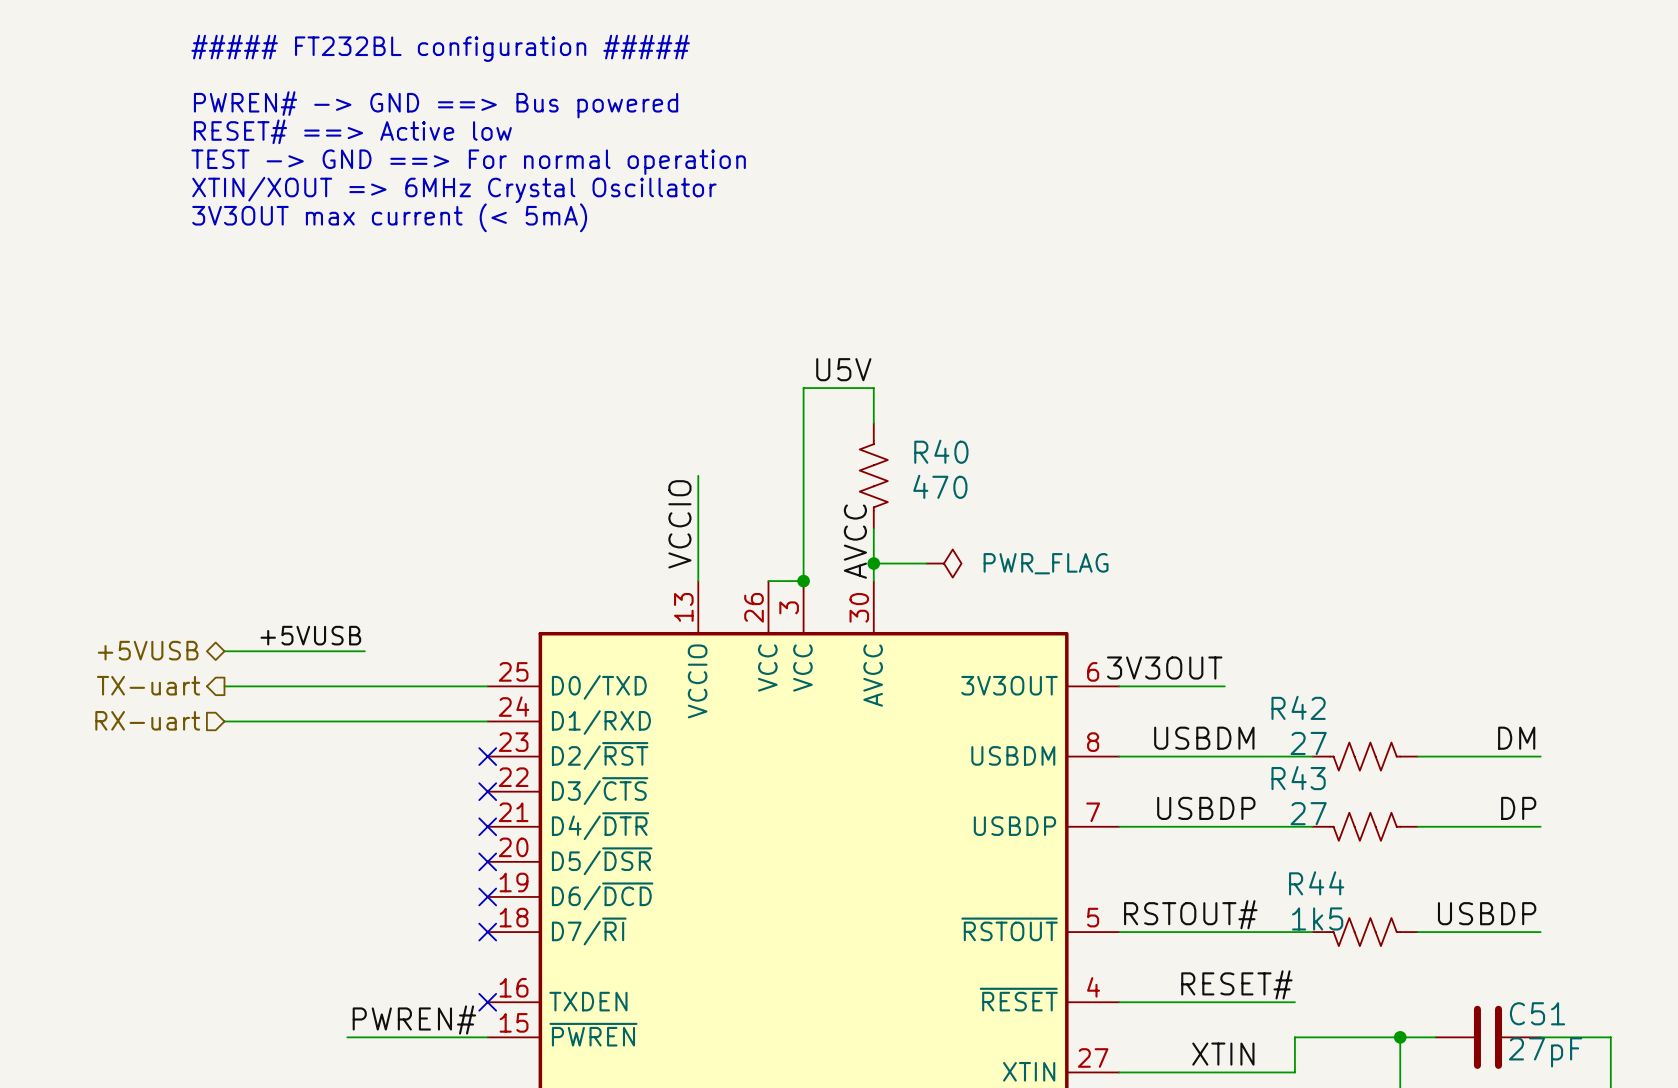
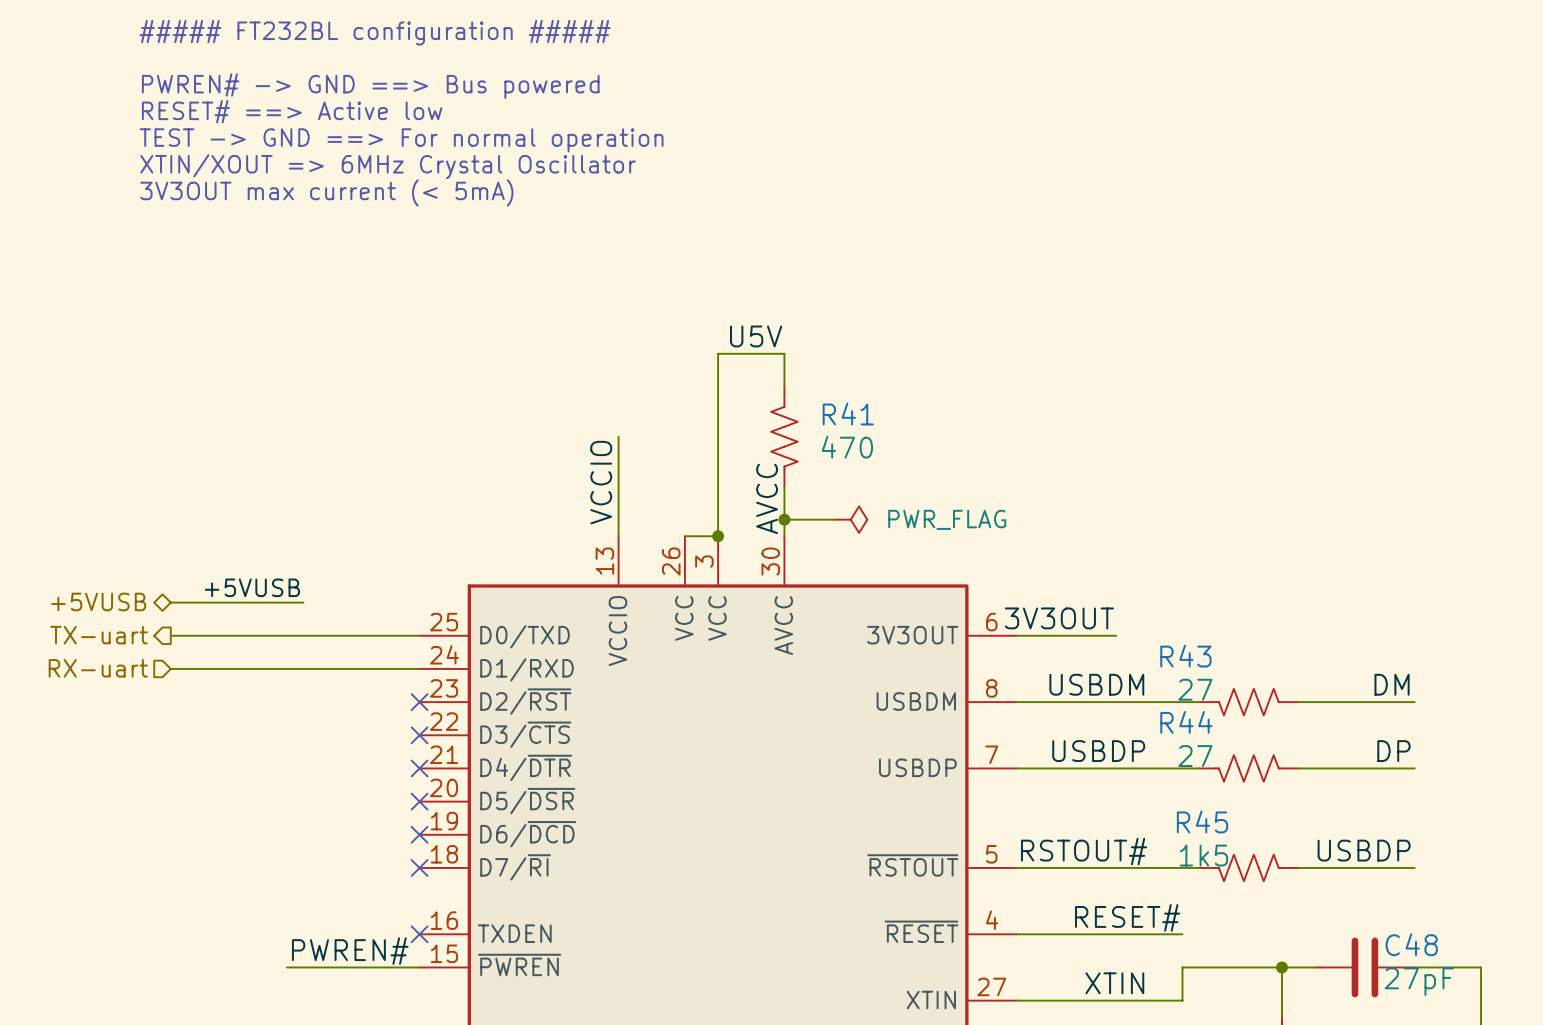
R40 name: R40 (941, 451) -> R41 (848, 414)
R42 name: R42 (1298, 707) -> R43 (1185, 656)
R43 name: R43 (1298, 778) -> R44 (1186, 722)
R44 name: R44 (1316, 883) -> R45 (1202, 821)
C51 name: C51 (1537, 1013) -> C48 (1411, 944)

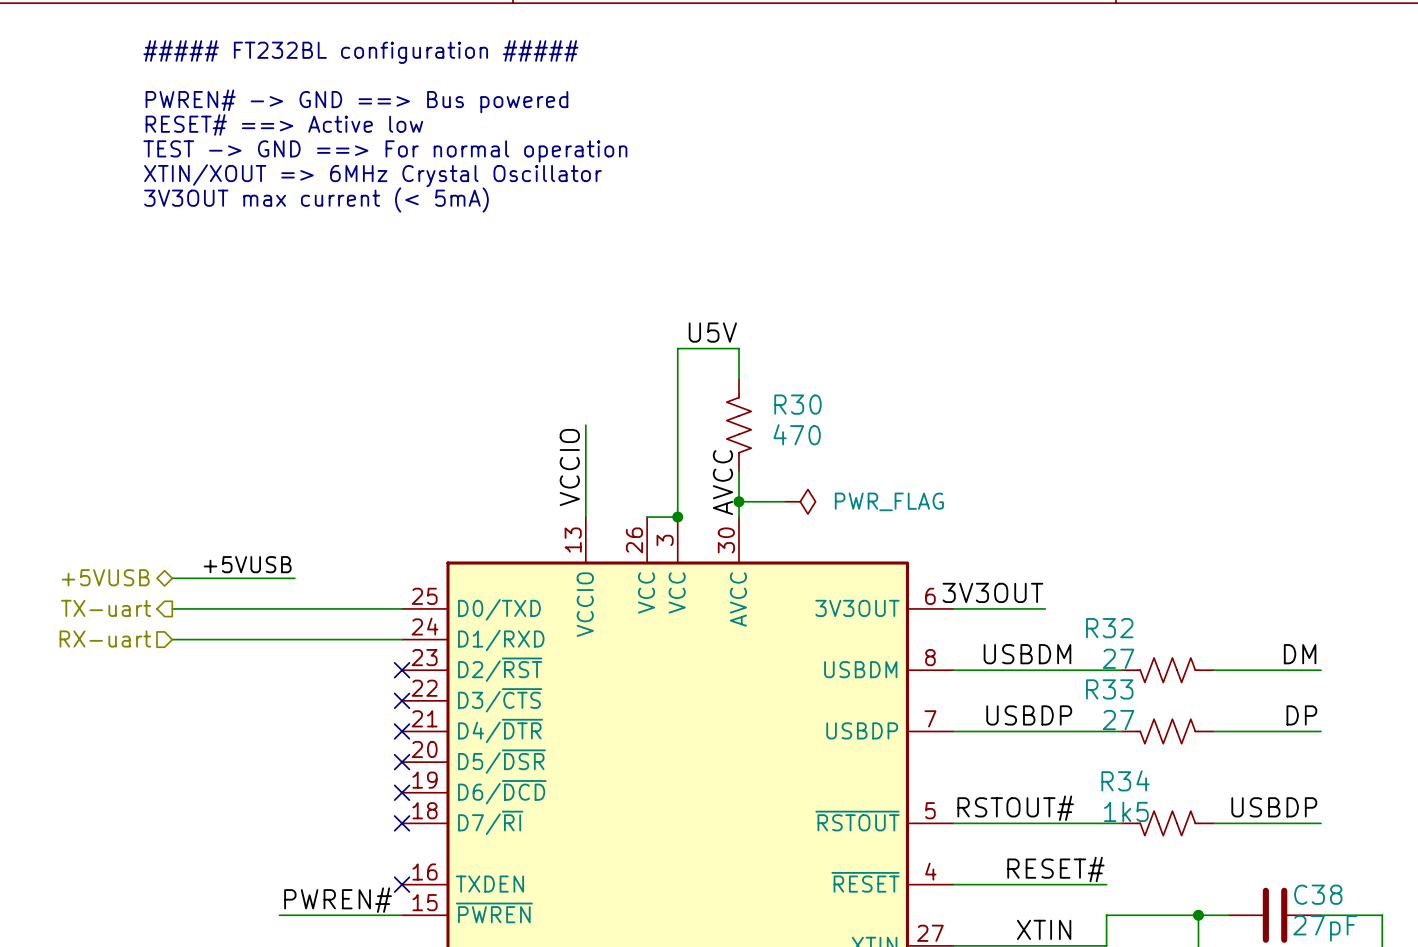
R41 name: R41 (848, 414) -> R30 (797, 404)
R43 name: R43 (1185, 656) -> R32 (1109, 628)
R44 name: R44 (1186, 722) -> R33 (1109, 689)
R45 name: R45 (1202, 821) -> R34 (1125, 780)
C48 name: C48 (1411, 944) -> C38 (1318, 894)

